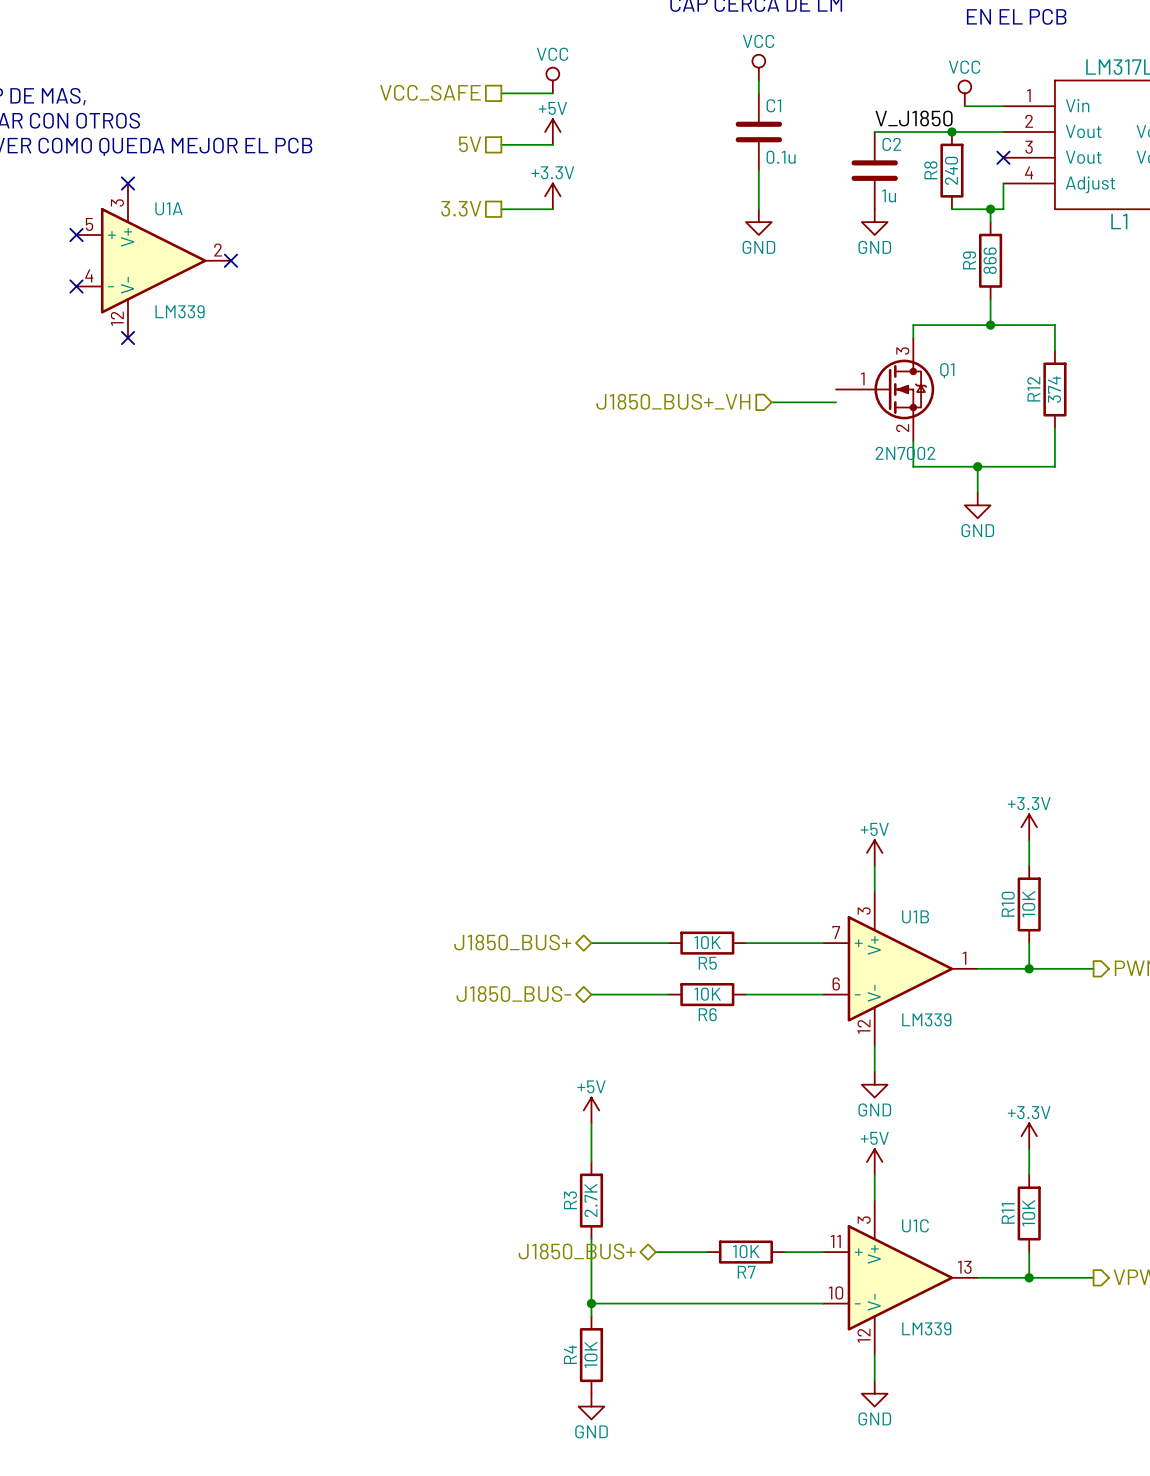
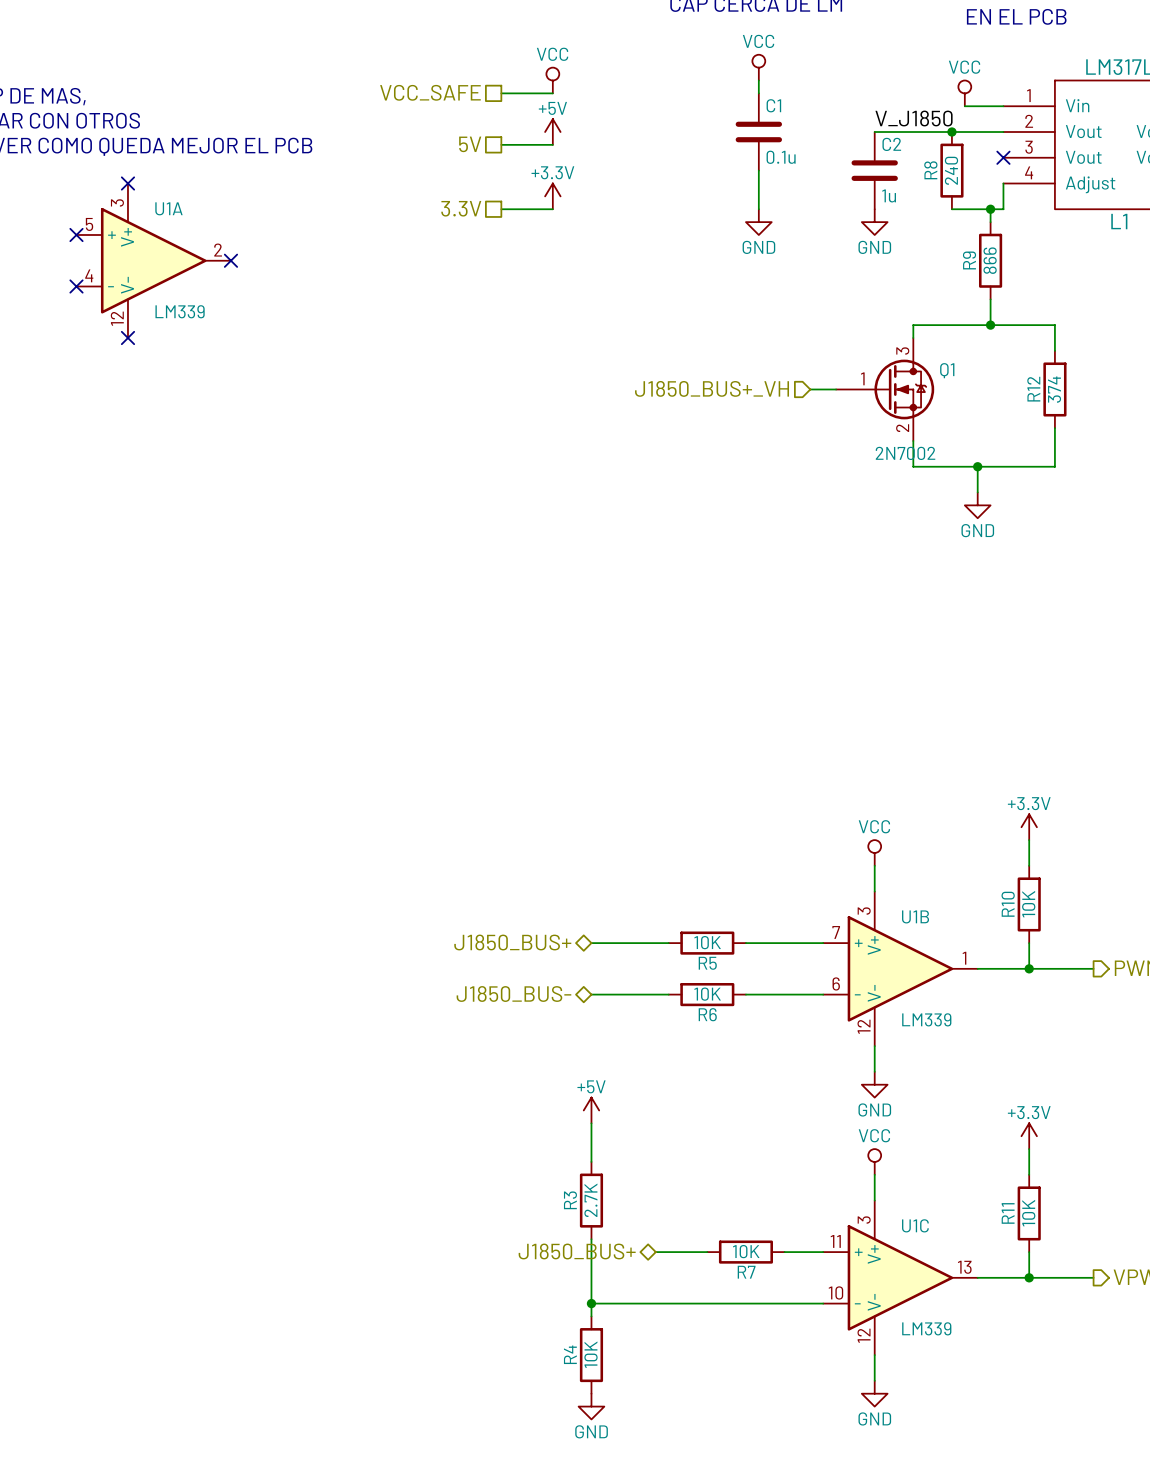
wire: none -> (810, 389) (836, 389)
hierarchical label position: J1850_BUS+_VH (673, 401) -> J1850_BUS+_VH (712, 388)
wire: (771, 402) (836, 402) -> none
power symbol: +5V (874, 852) -> VCC (874, 852)
power symbol: +5V (874, 1161) -> VCC (874, 1161)

